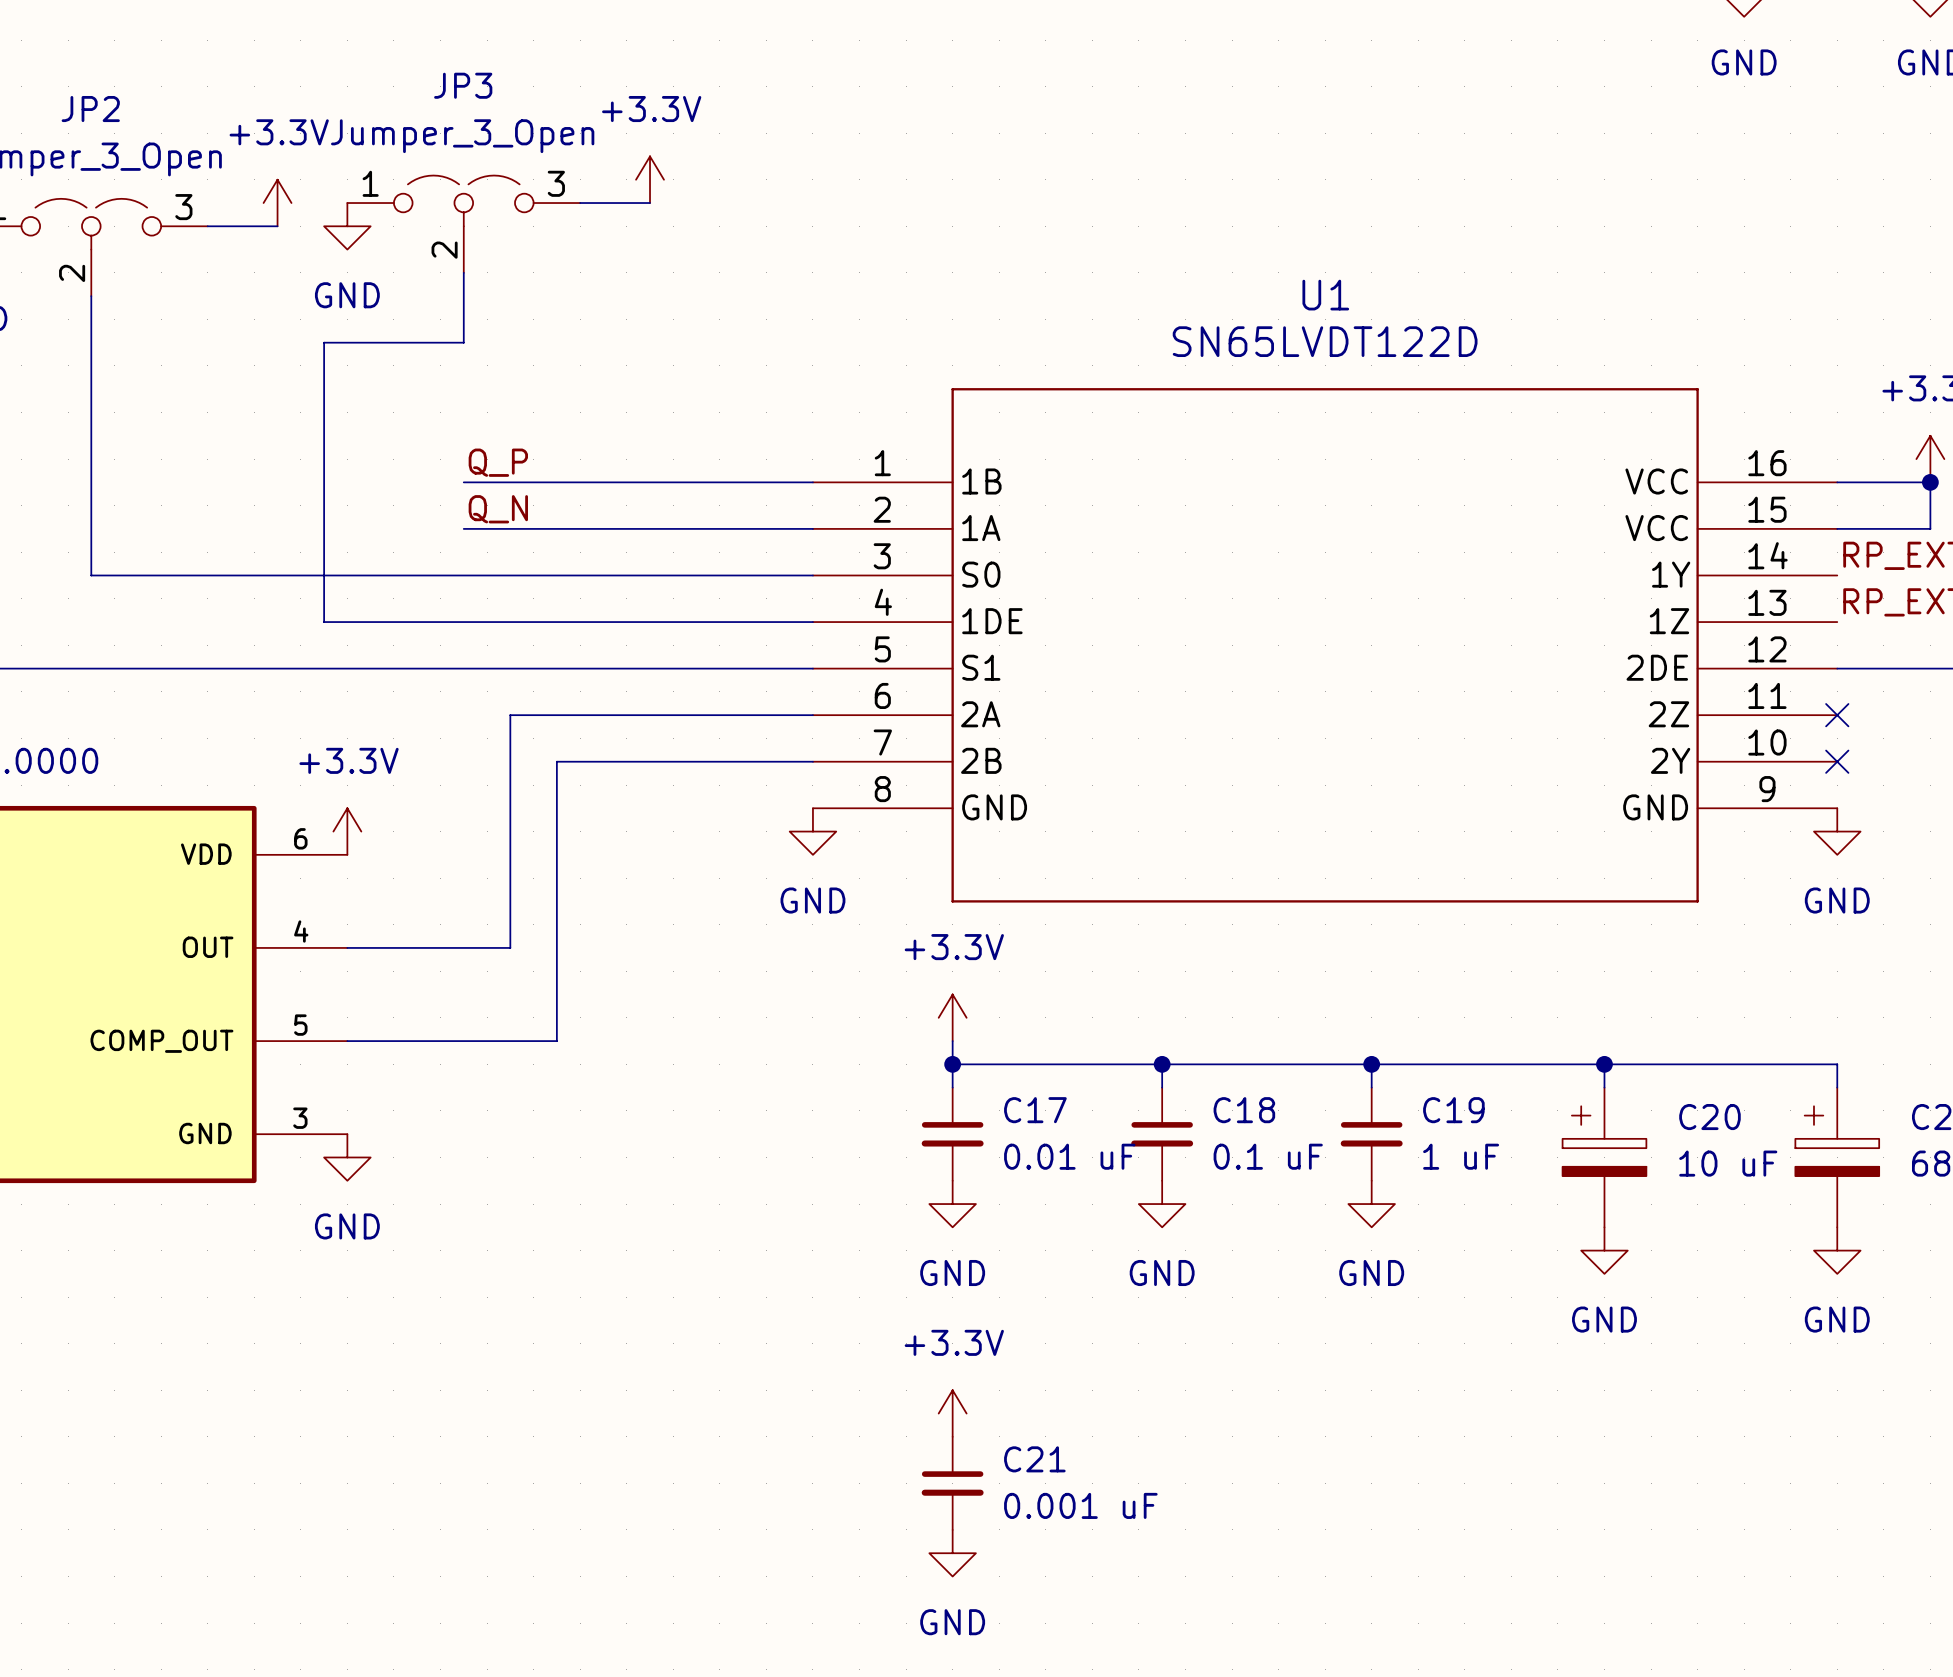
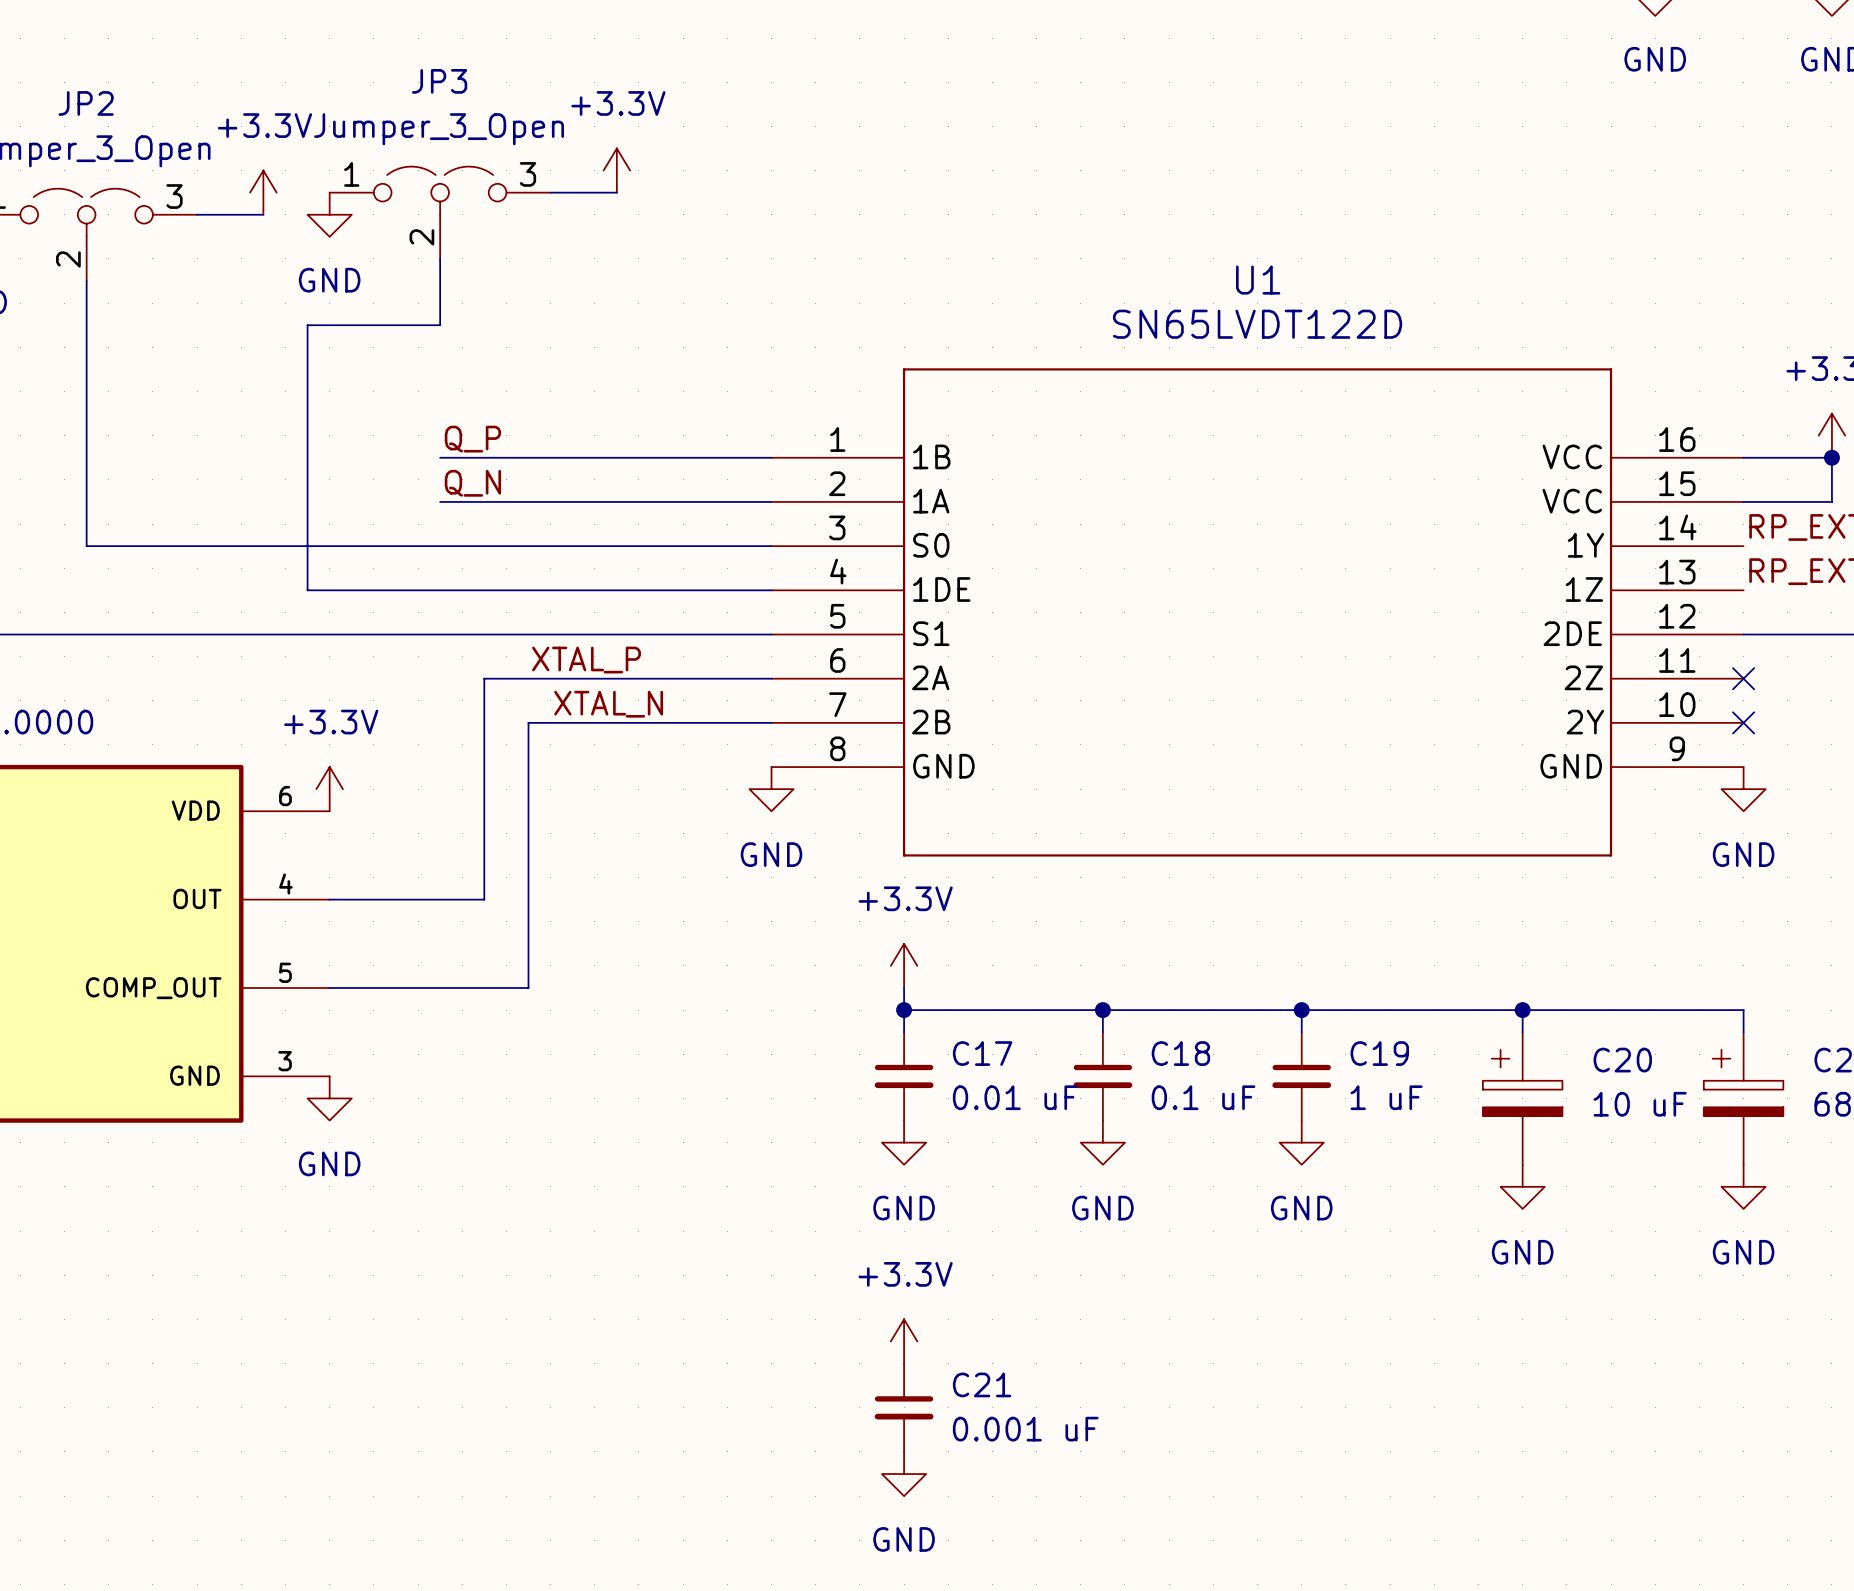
label: none -> XTAL_P (586, 660)
label: none -> XTAL_N (608, 704)

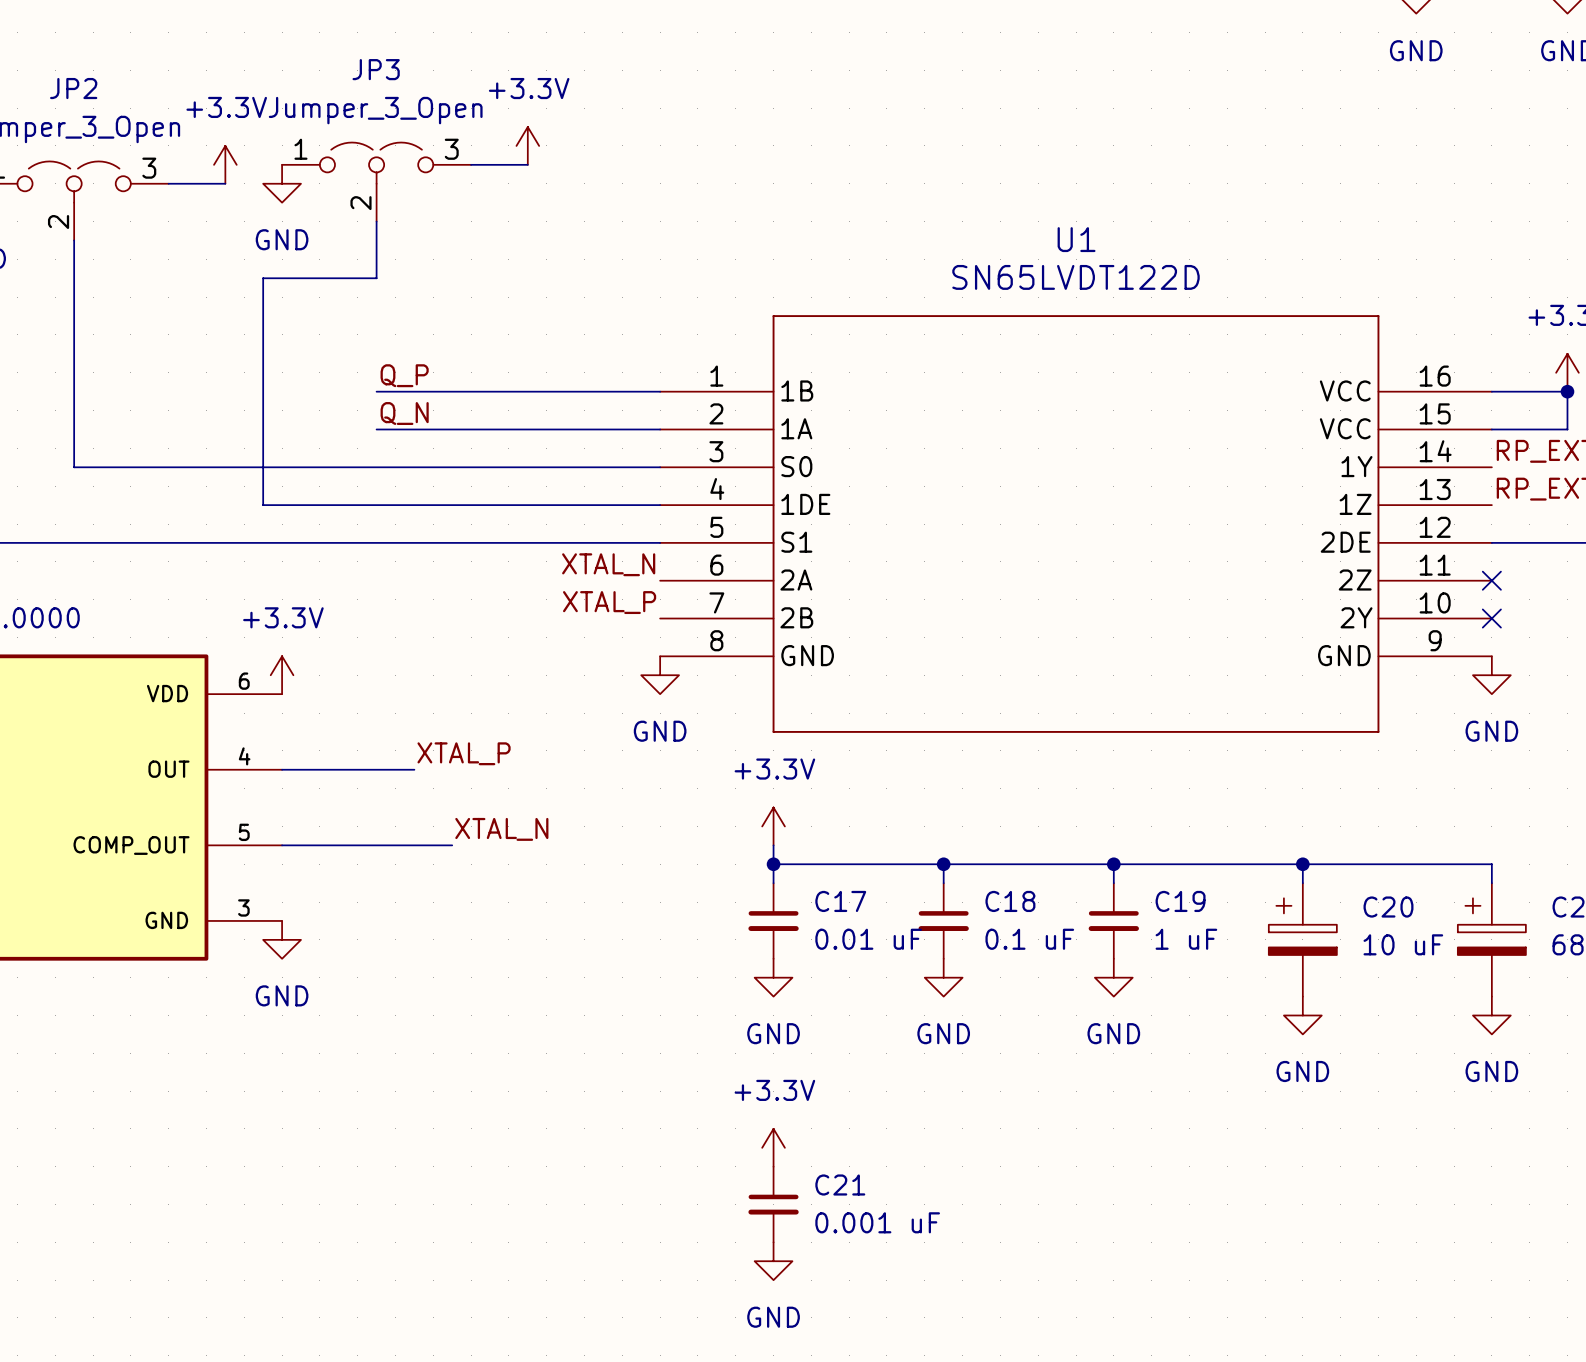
label: XTAL_P (586, 660) -> none
label: none -> XTAL_N (608, 564)
wire: (771, 678) (484, 678) (484, 899) -> none
label: XTAL_N (608, 704) -> none
label: none -> XTAL_P (609, 602)
wire: (771, 722) (528, 722) (528, 987) -> none
label: none -> XTAL_P (464, 753)
label: none -> XTAL_N (501, 829)

